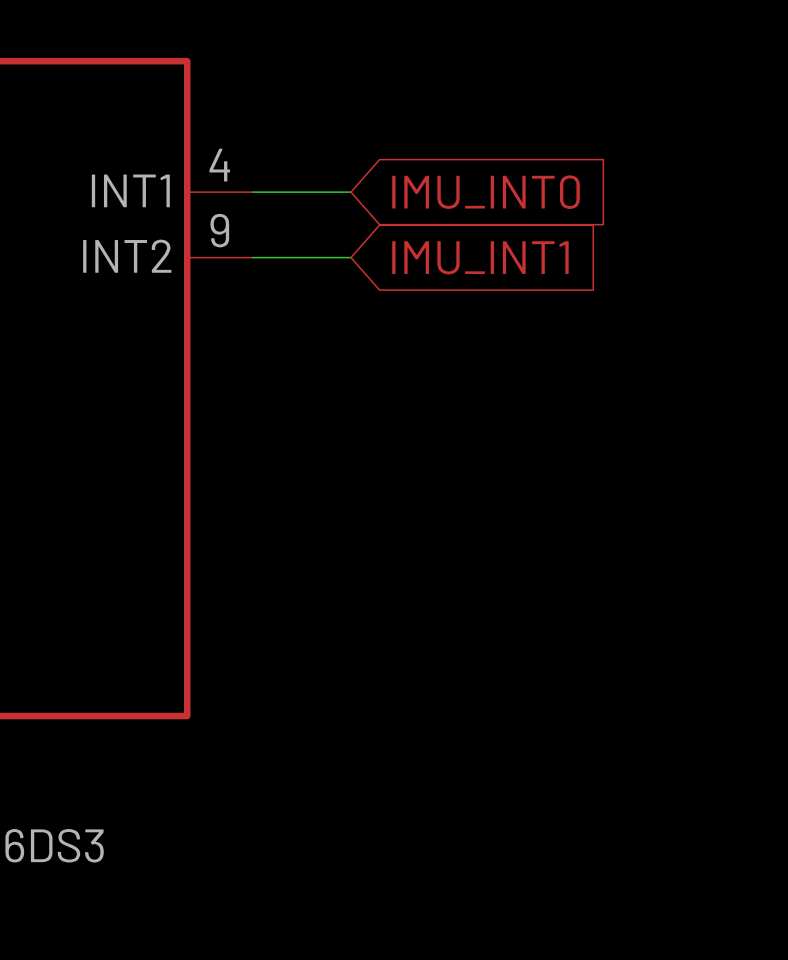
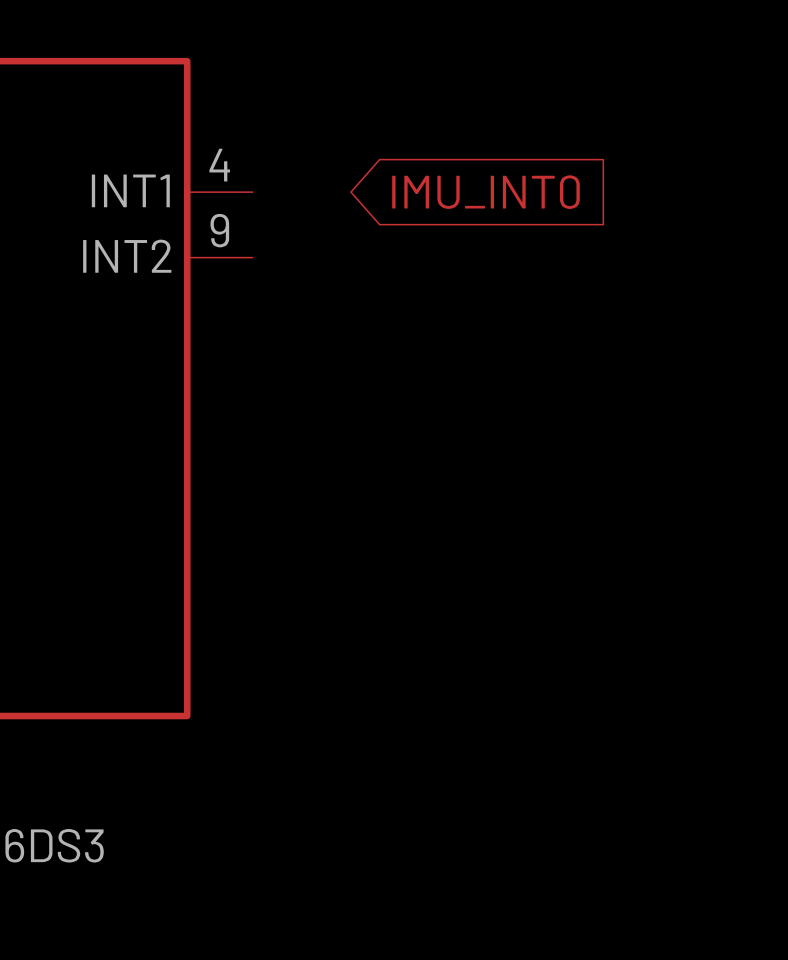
wire: (252, 192) (350, 192) -> none
wire: (252, 257) (350, 257) -> none
global label: IMU_INT1 (480, 257) -> none

